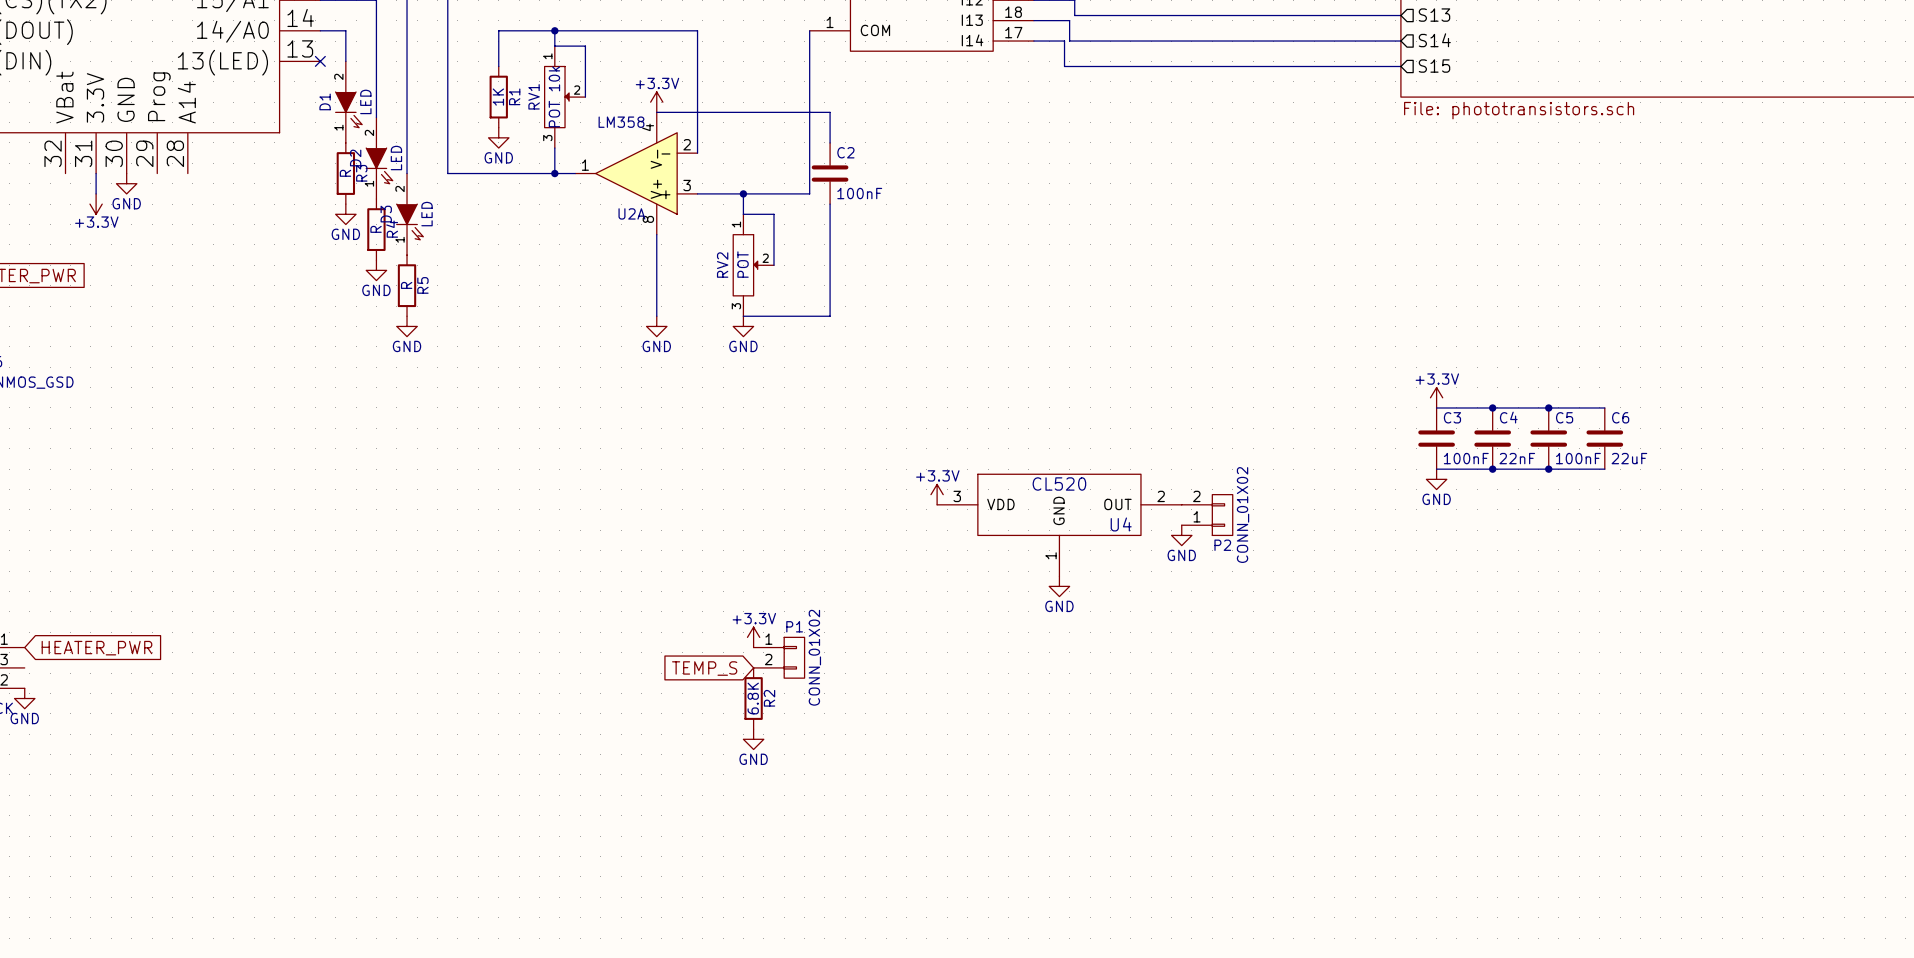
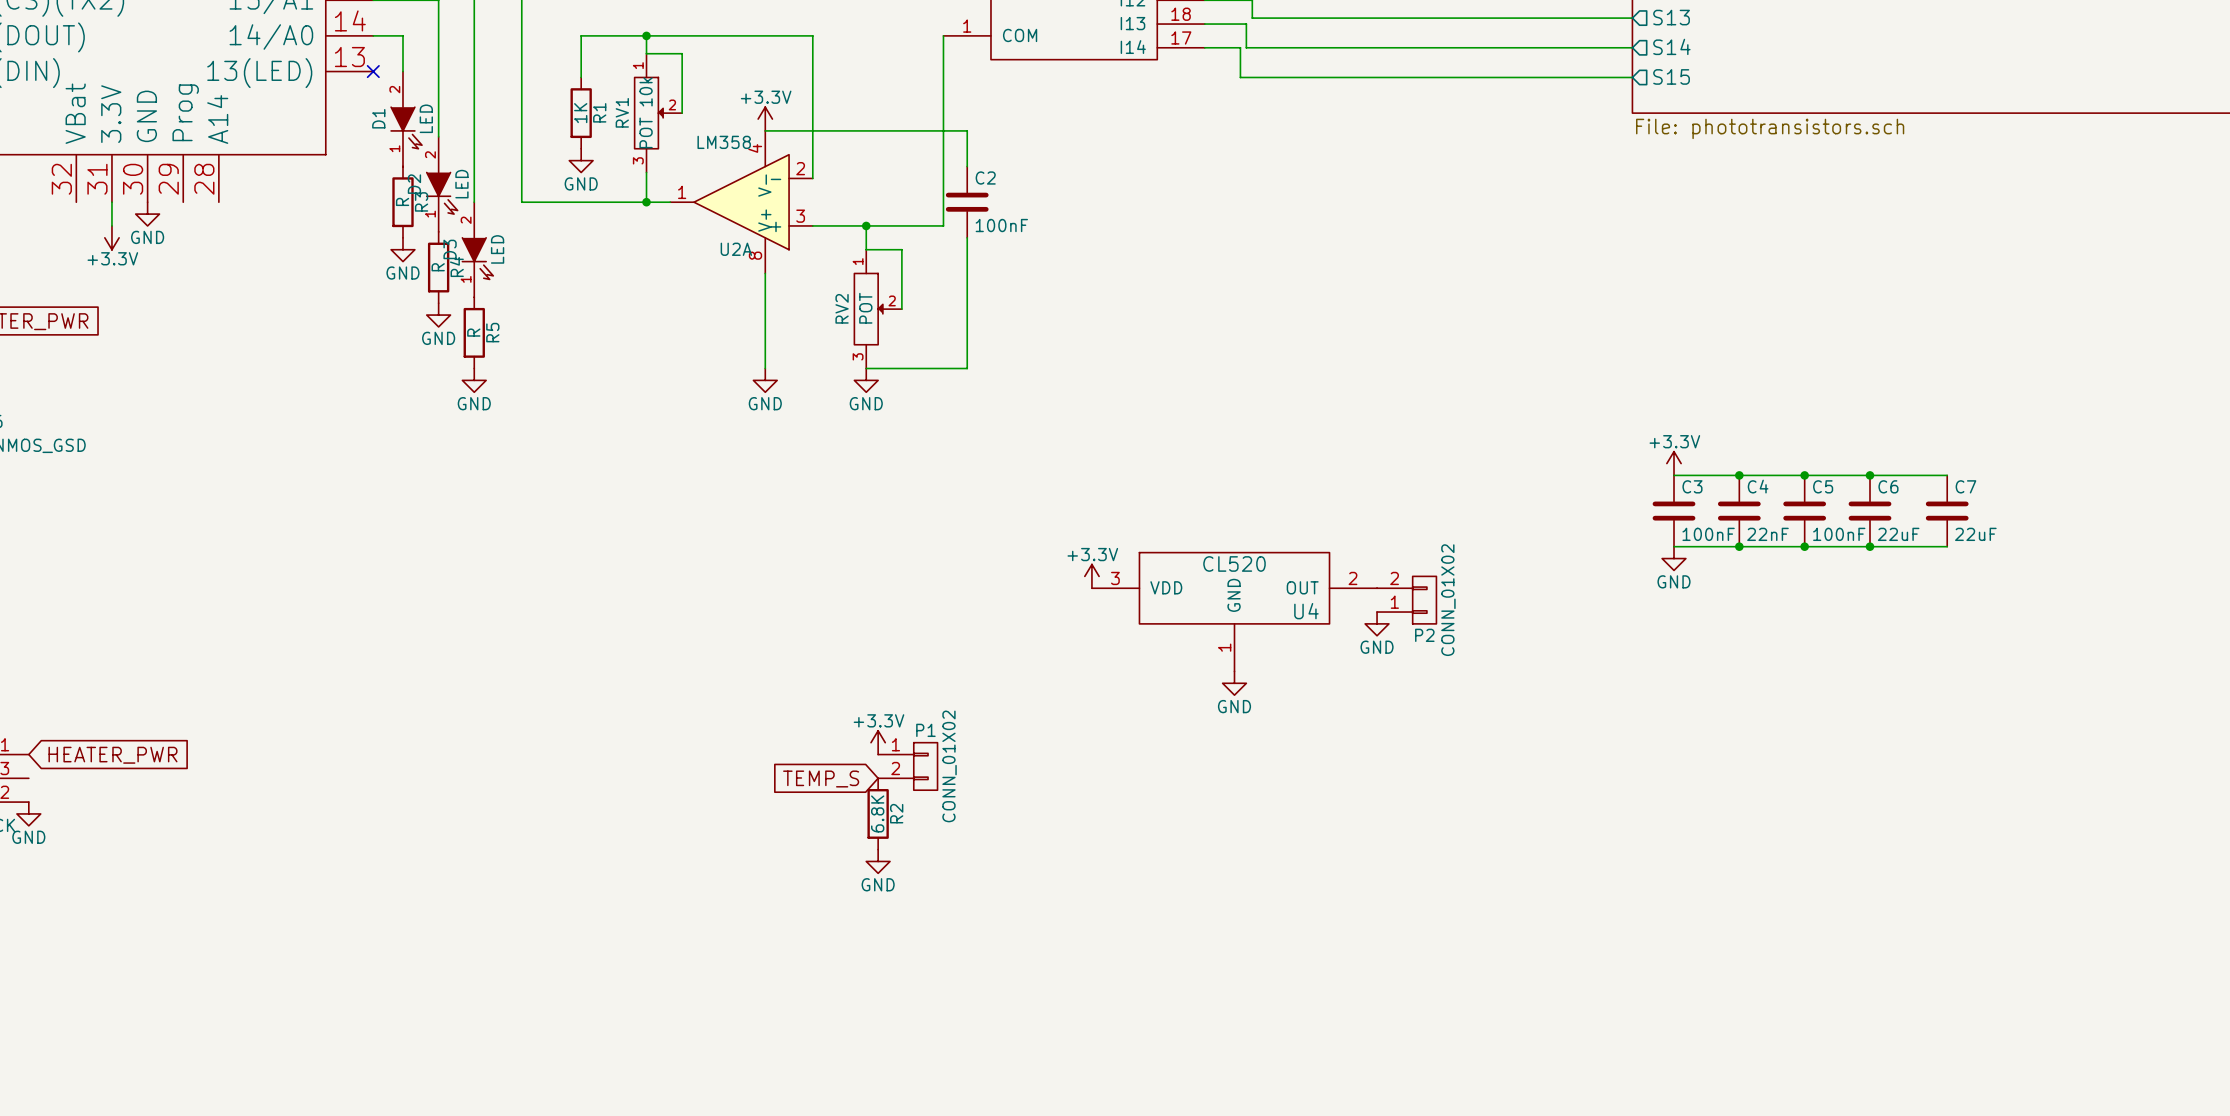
wire: none -> (1870, 475) (1947, 475)
junction: none -> (1870, 475)
C7: none -> 22uF (1947, 511)
wire: none -> (1870, 546) (1947, 546)
junction: none -> (1870, 546)

